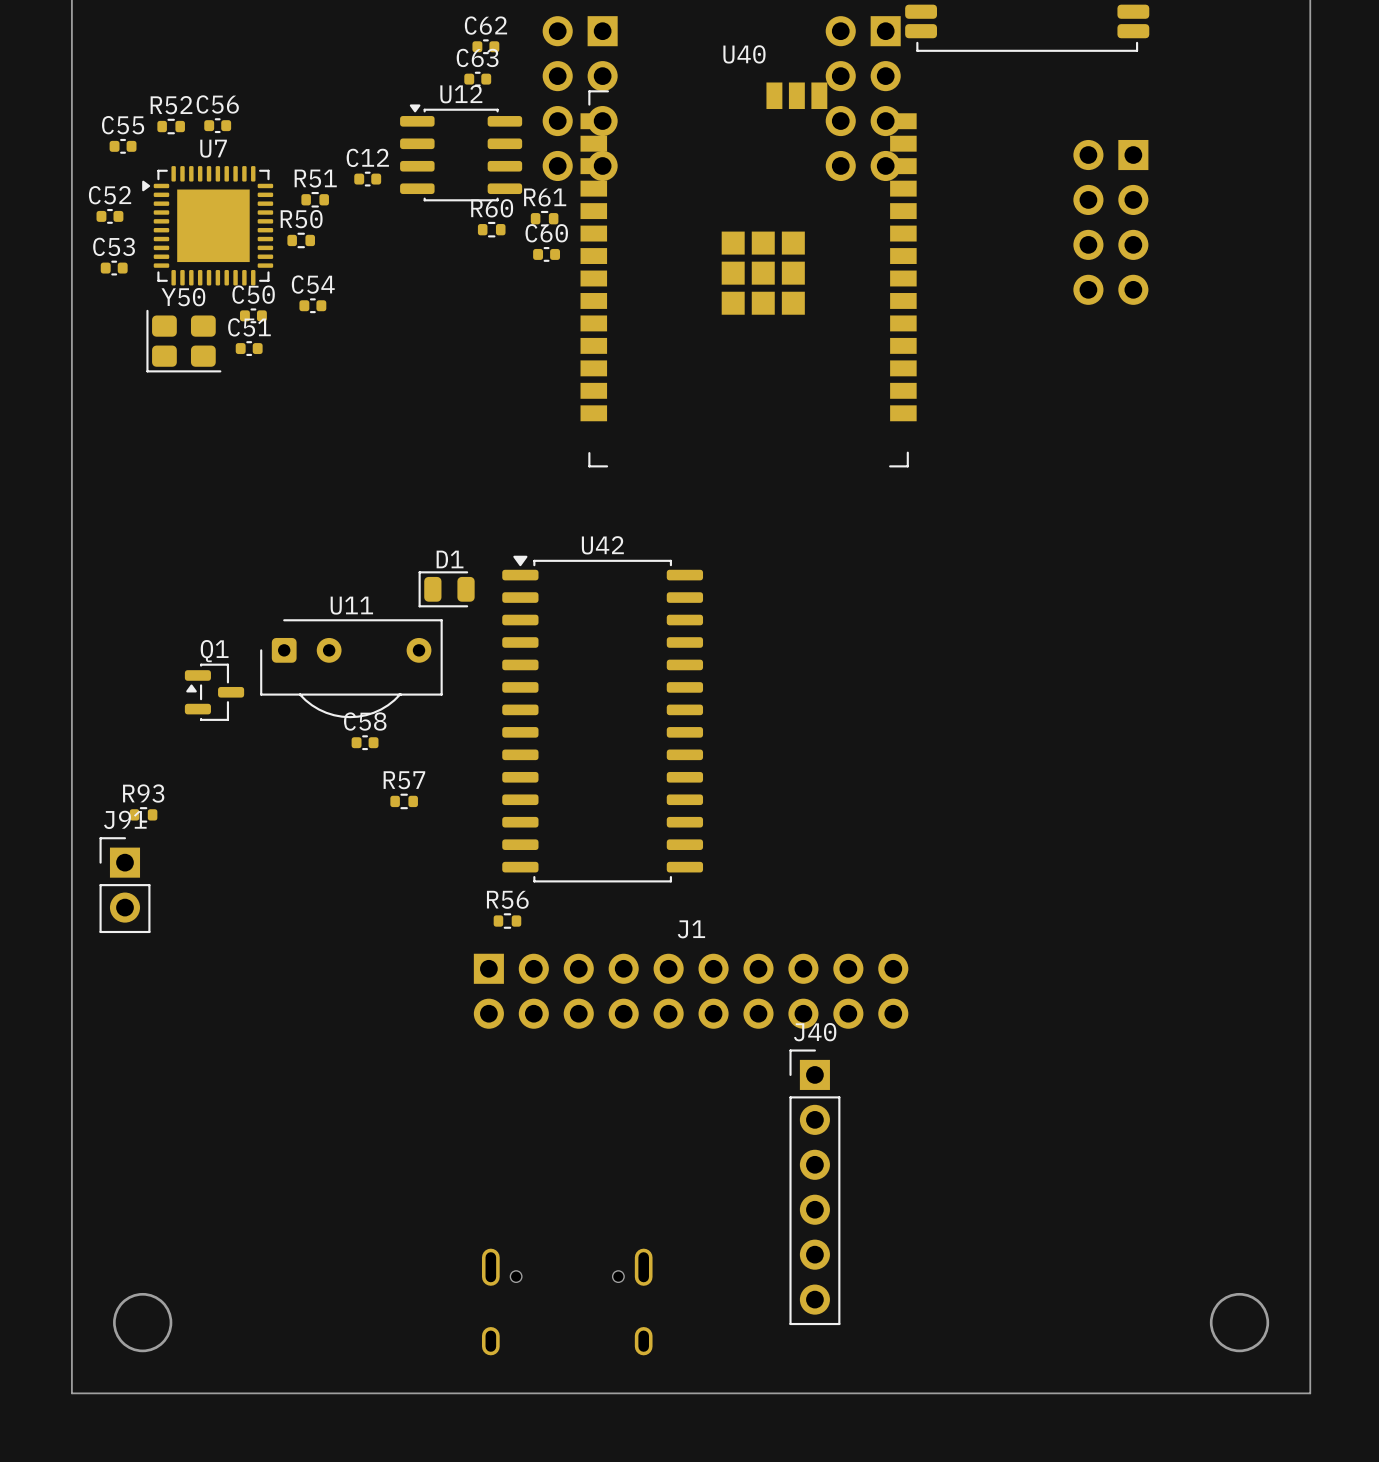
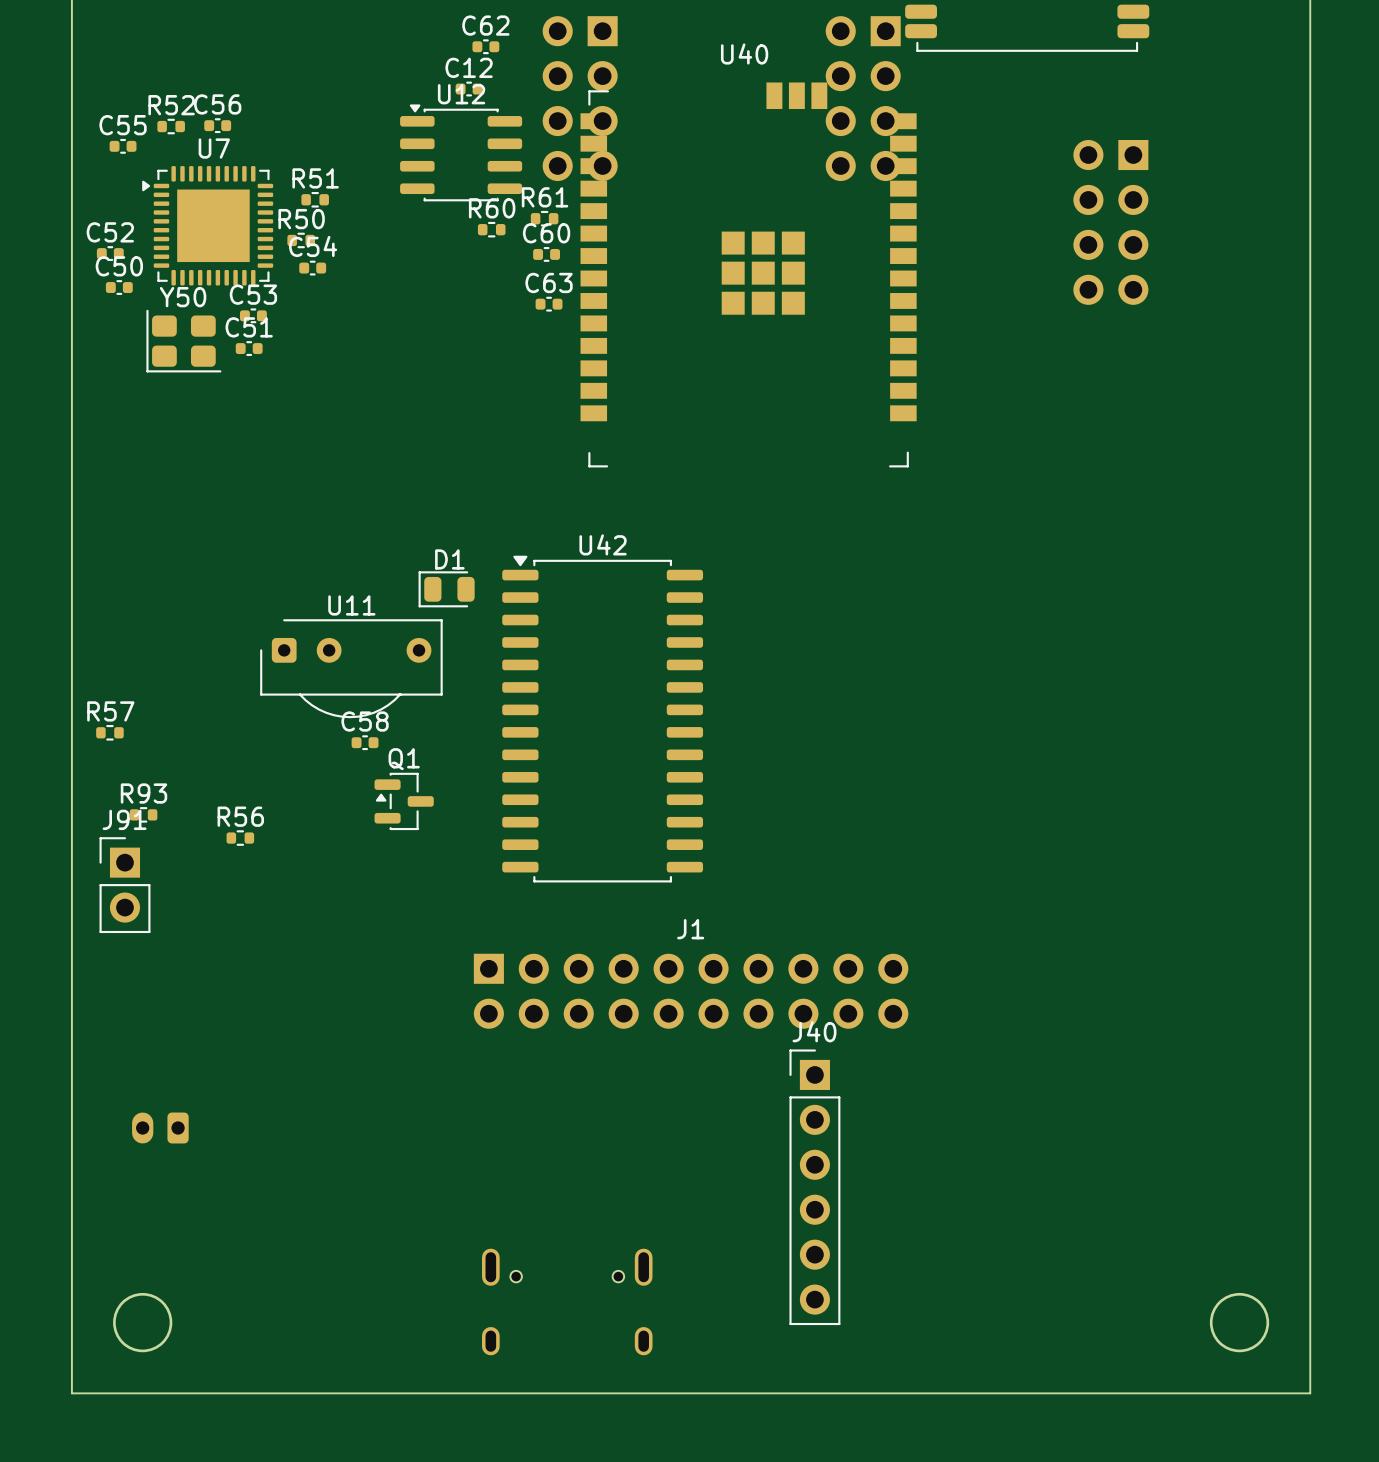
C63 position: (477, 79) -> (549, 304)
C12 position: (367, 179) -> (469, 89)
C52 position: (109, 216) -> (110, 253)
C53: (114, 268) -> none
C50: none -> (119, 287)
C50 name: C50 (253, 294) -> C53 (253, 294)
C54 position: (312, 305) -> (312, 268)
Q1 position: (214, 692) -> (404, 801)
R57 position: (404, 801) -> (109, 732)
R56 position: (507, 921) -> (240, 838)
part: none -> (160, 1128)

